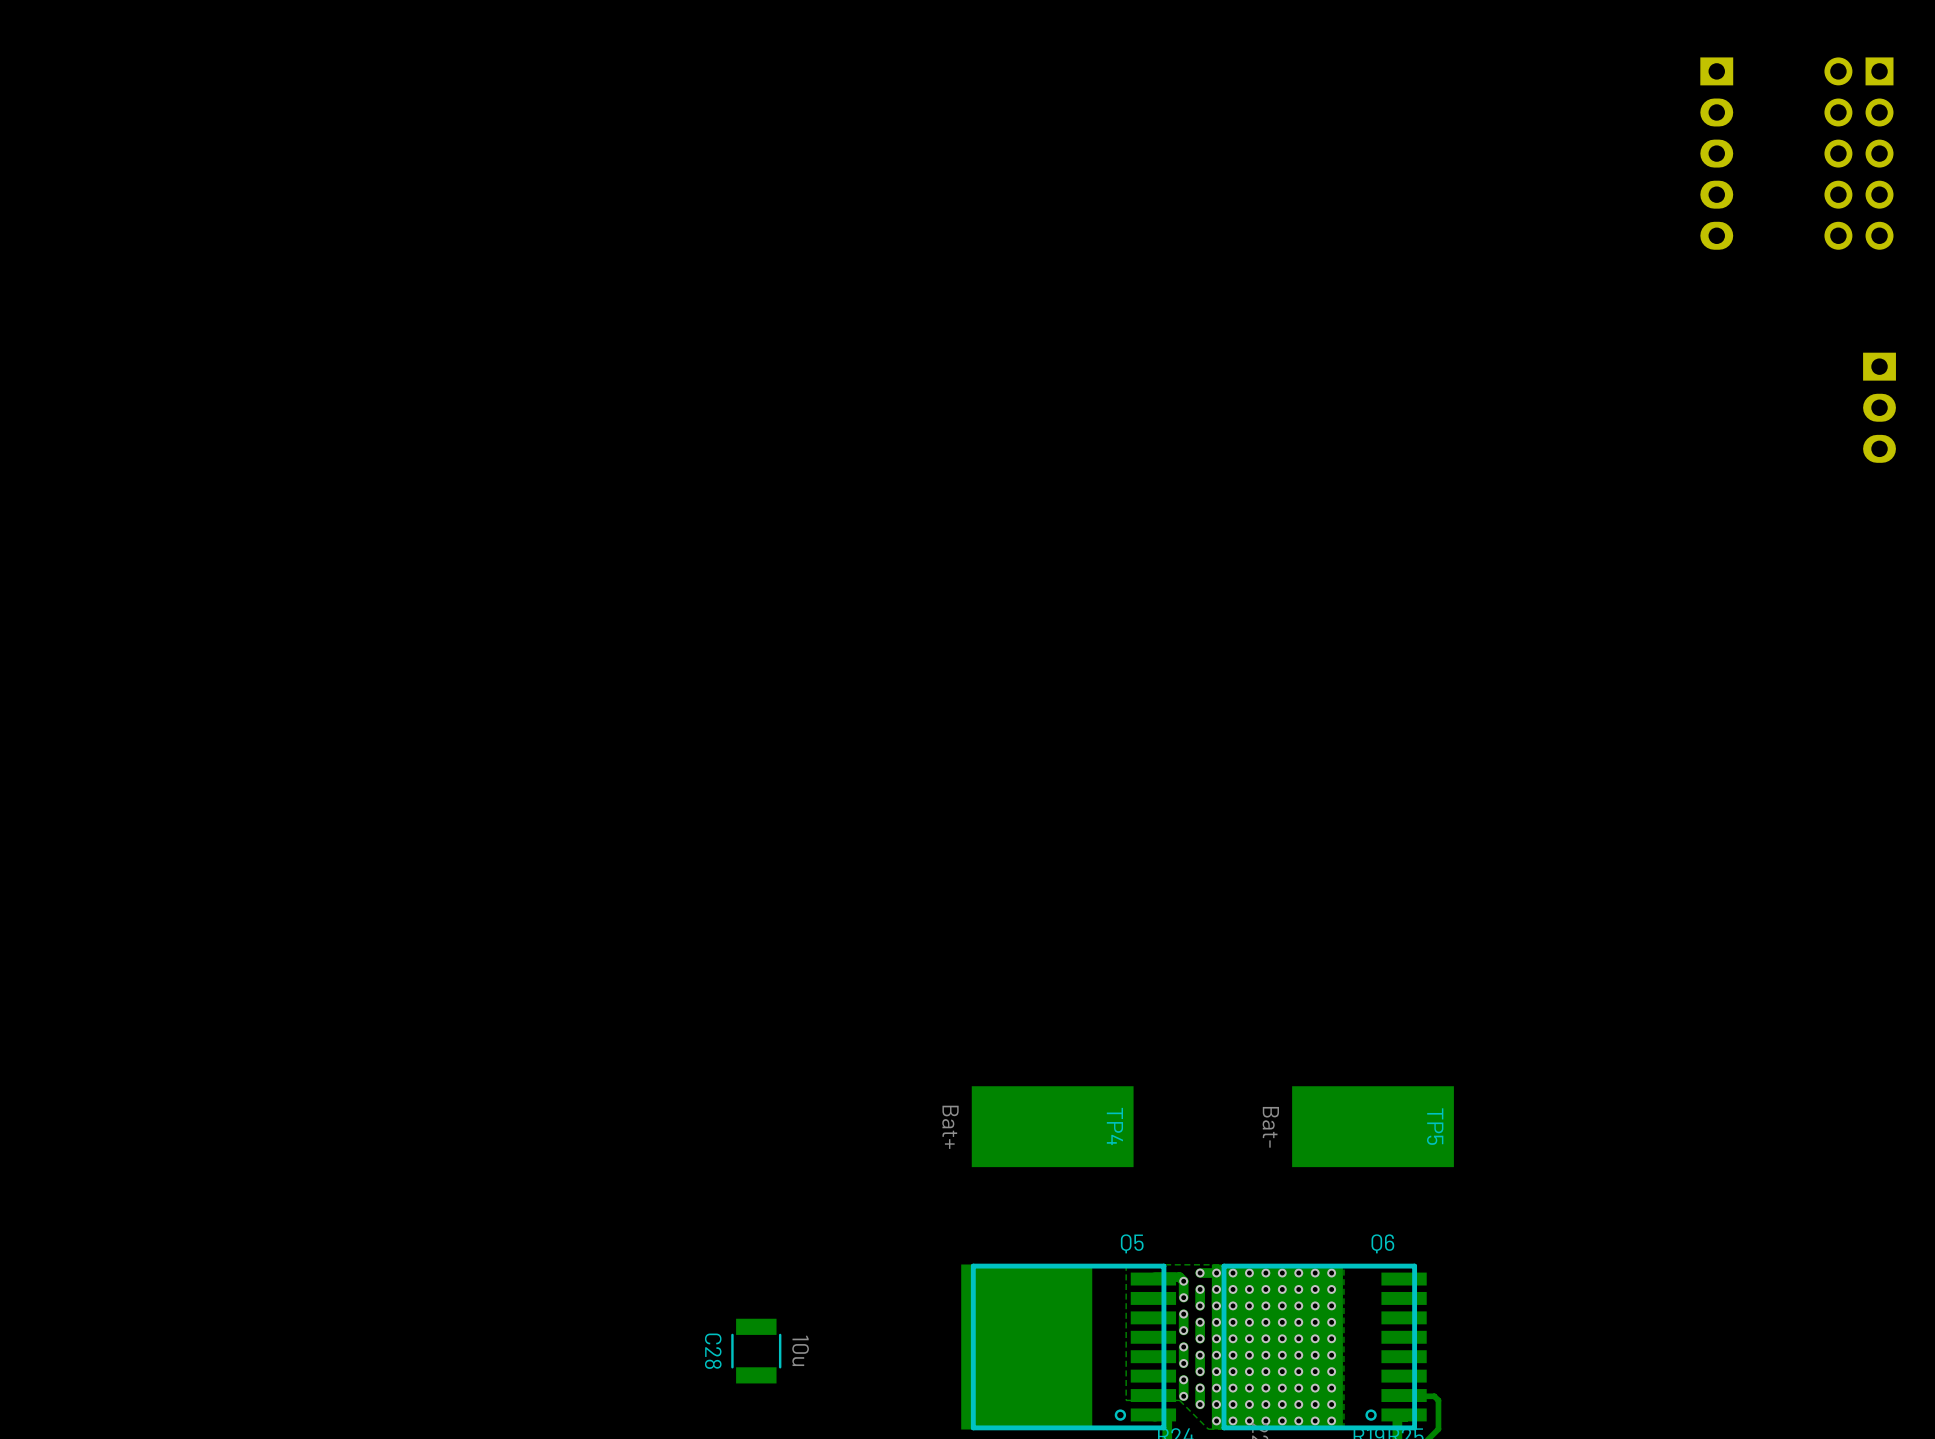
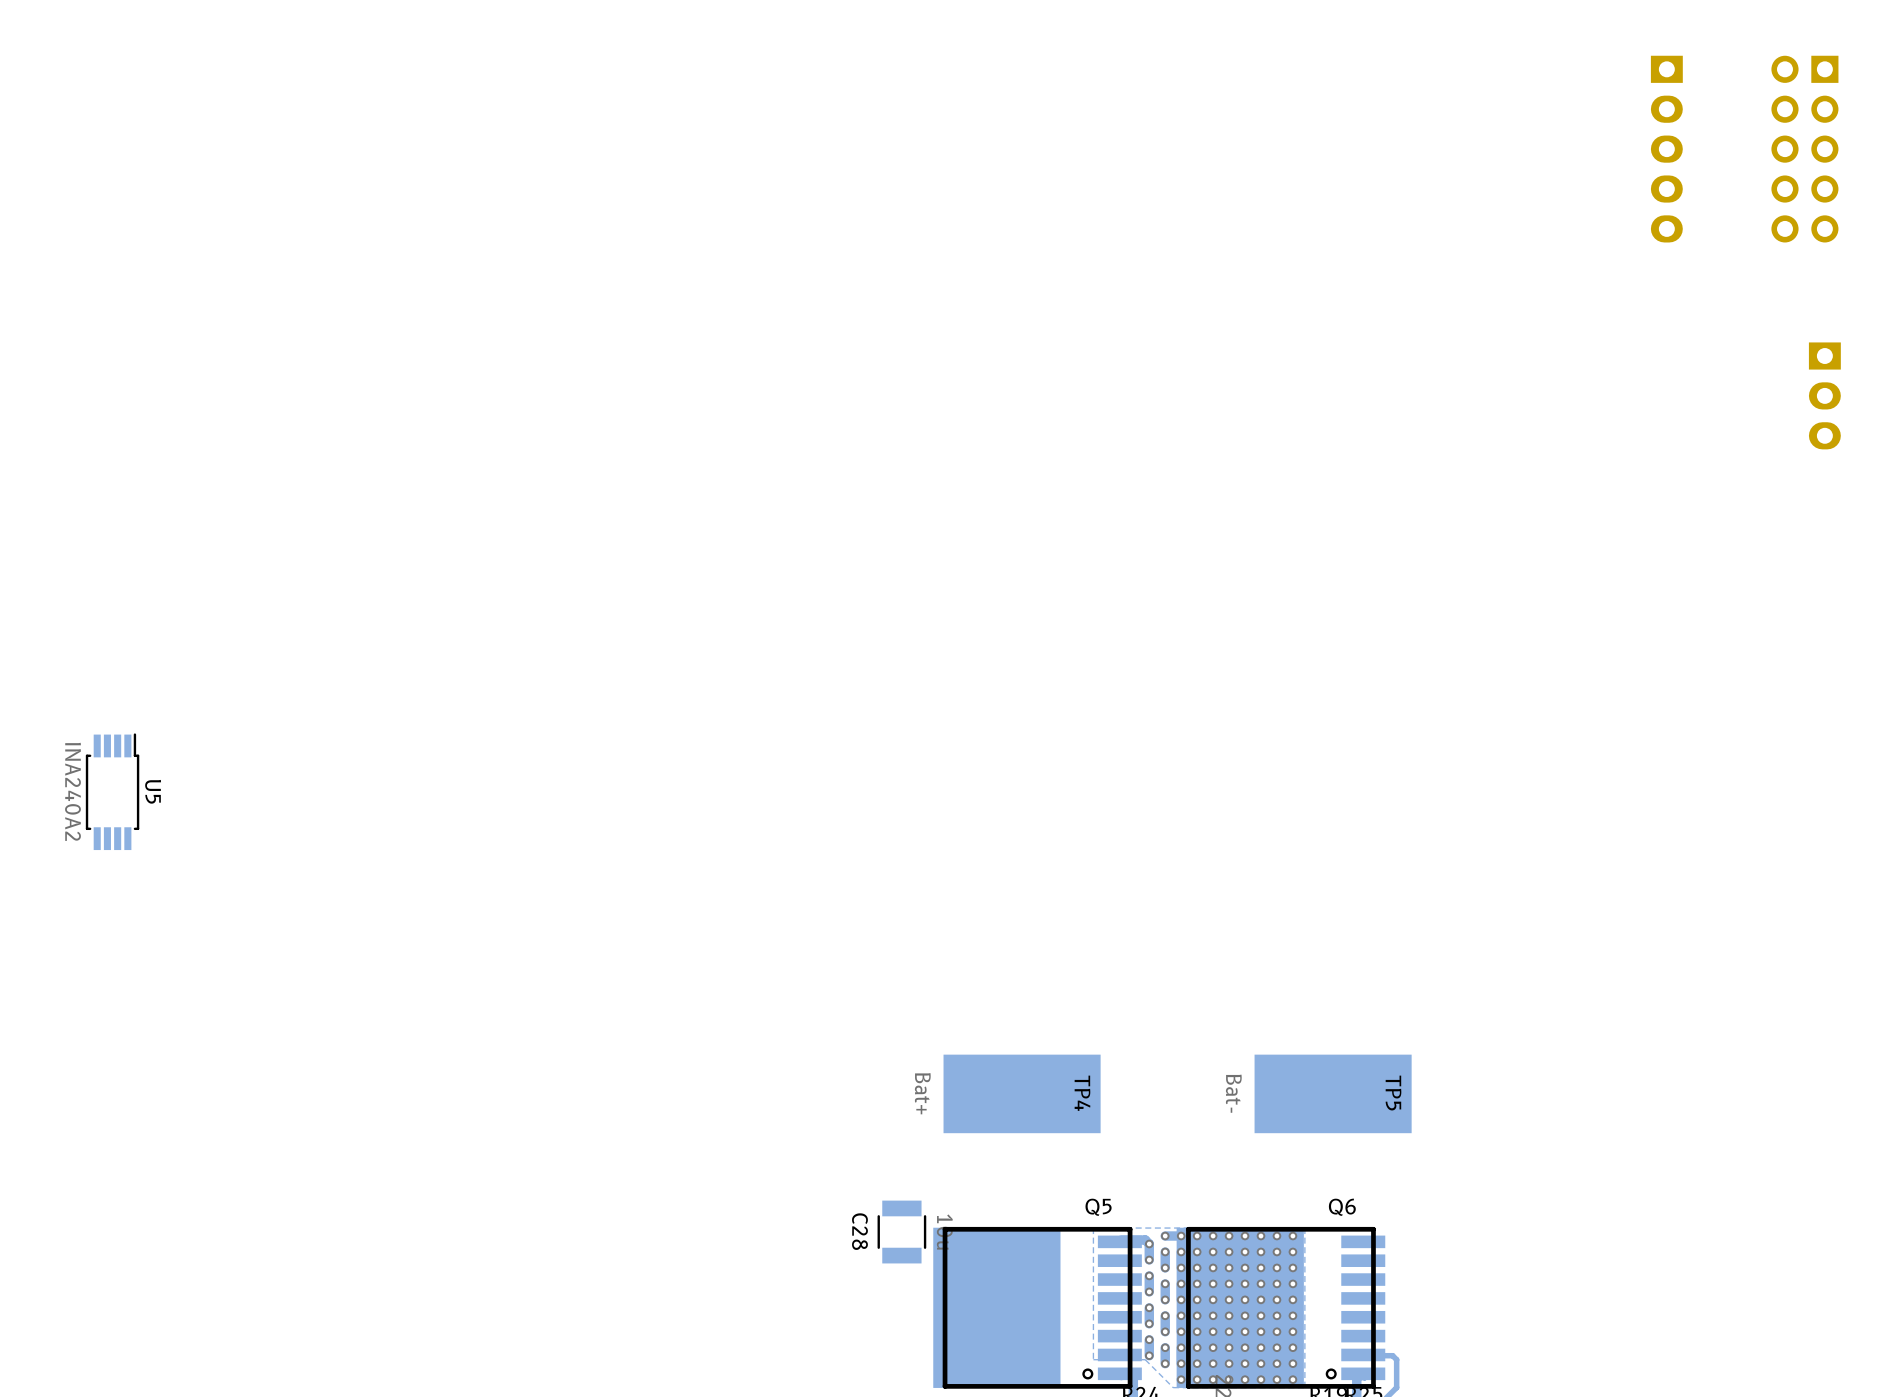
U5: none -> INA240A2 (112, 791)
C28 position: (756, 1351) -> (901, 1232)

